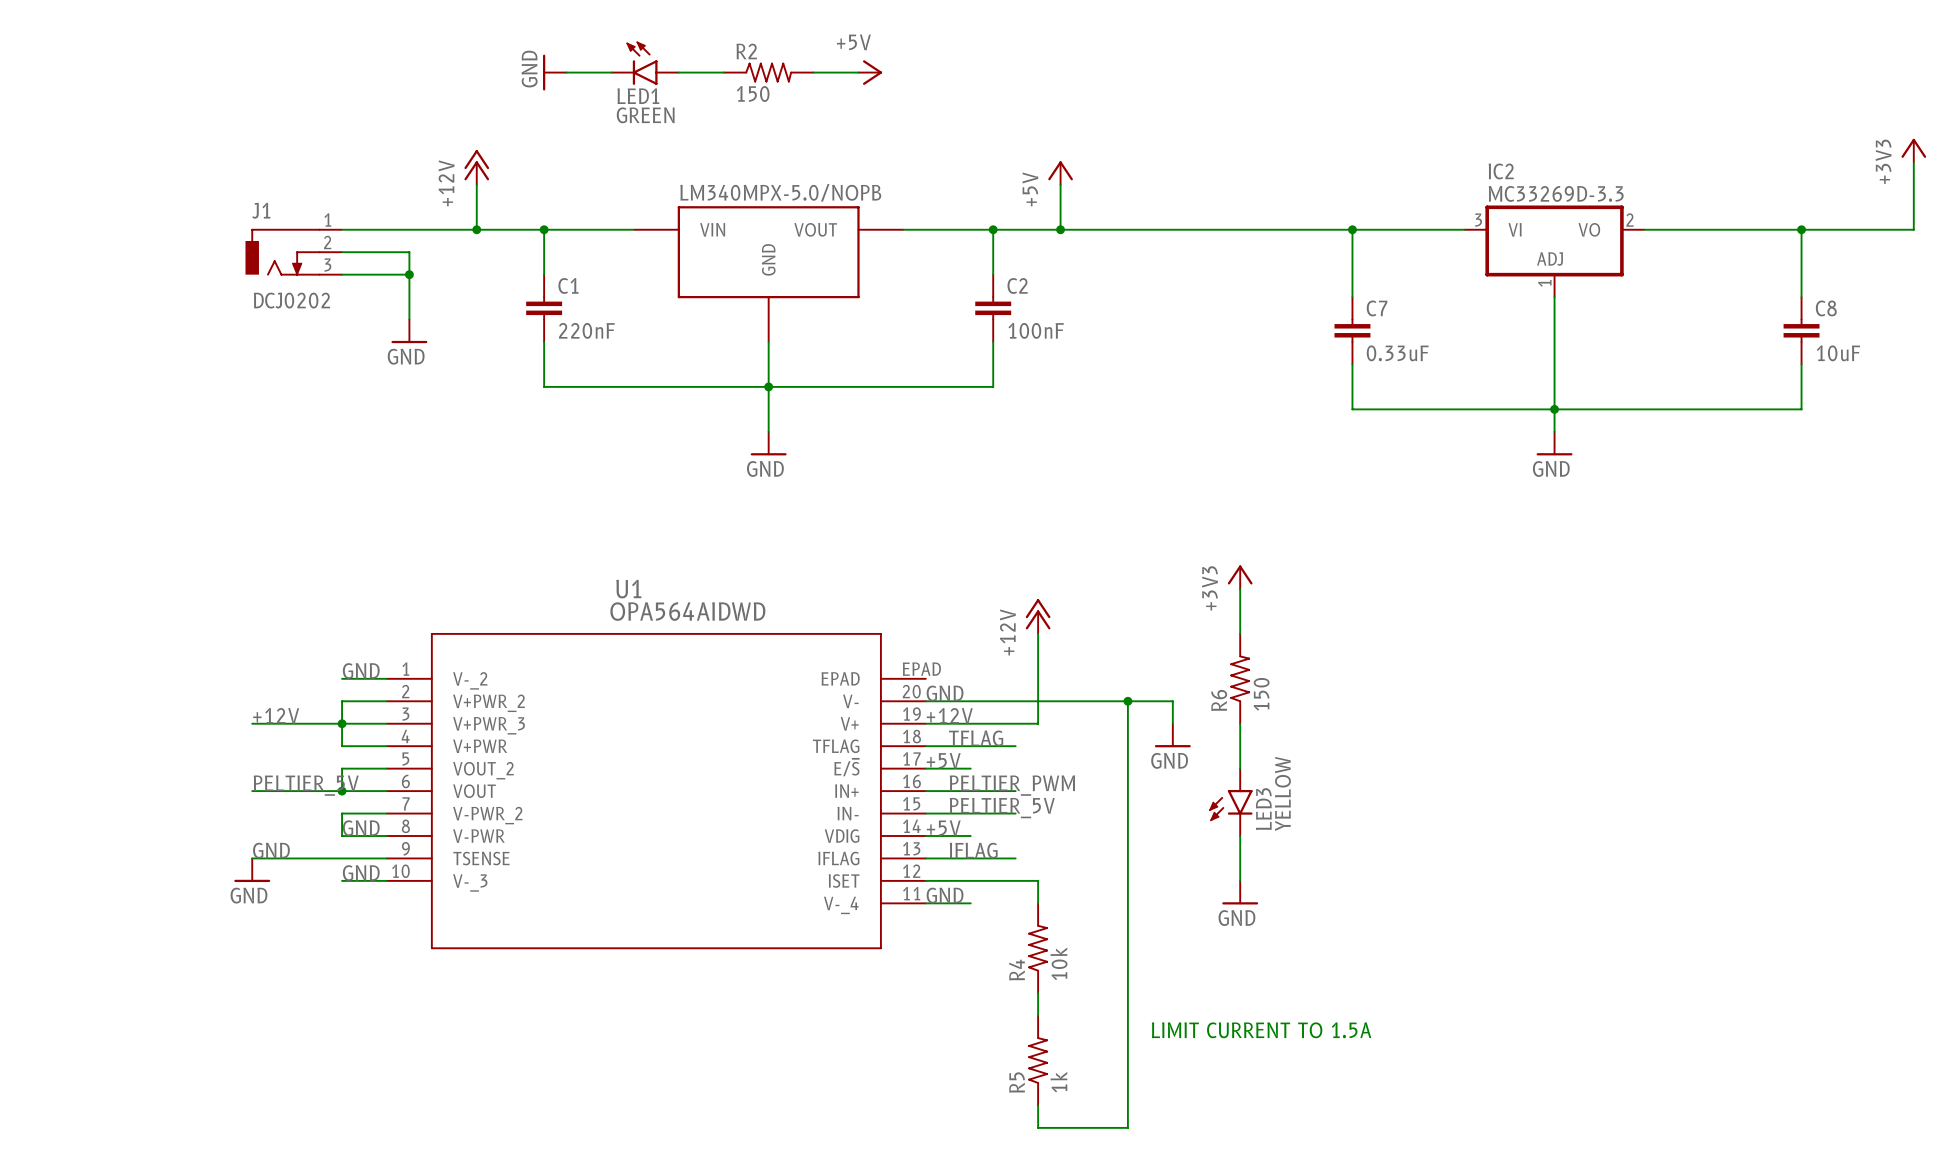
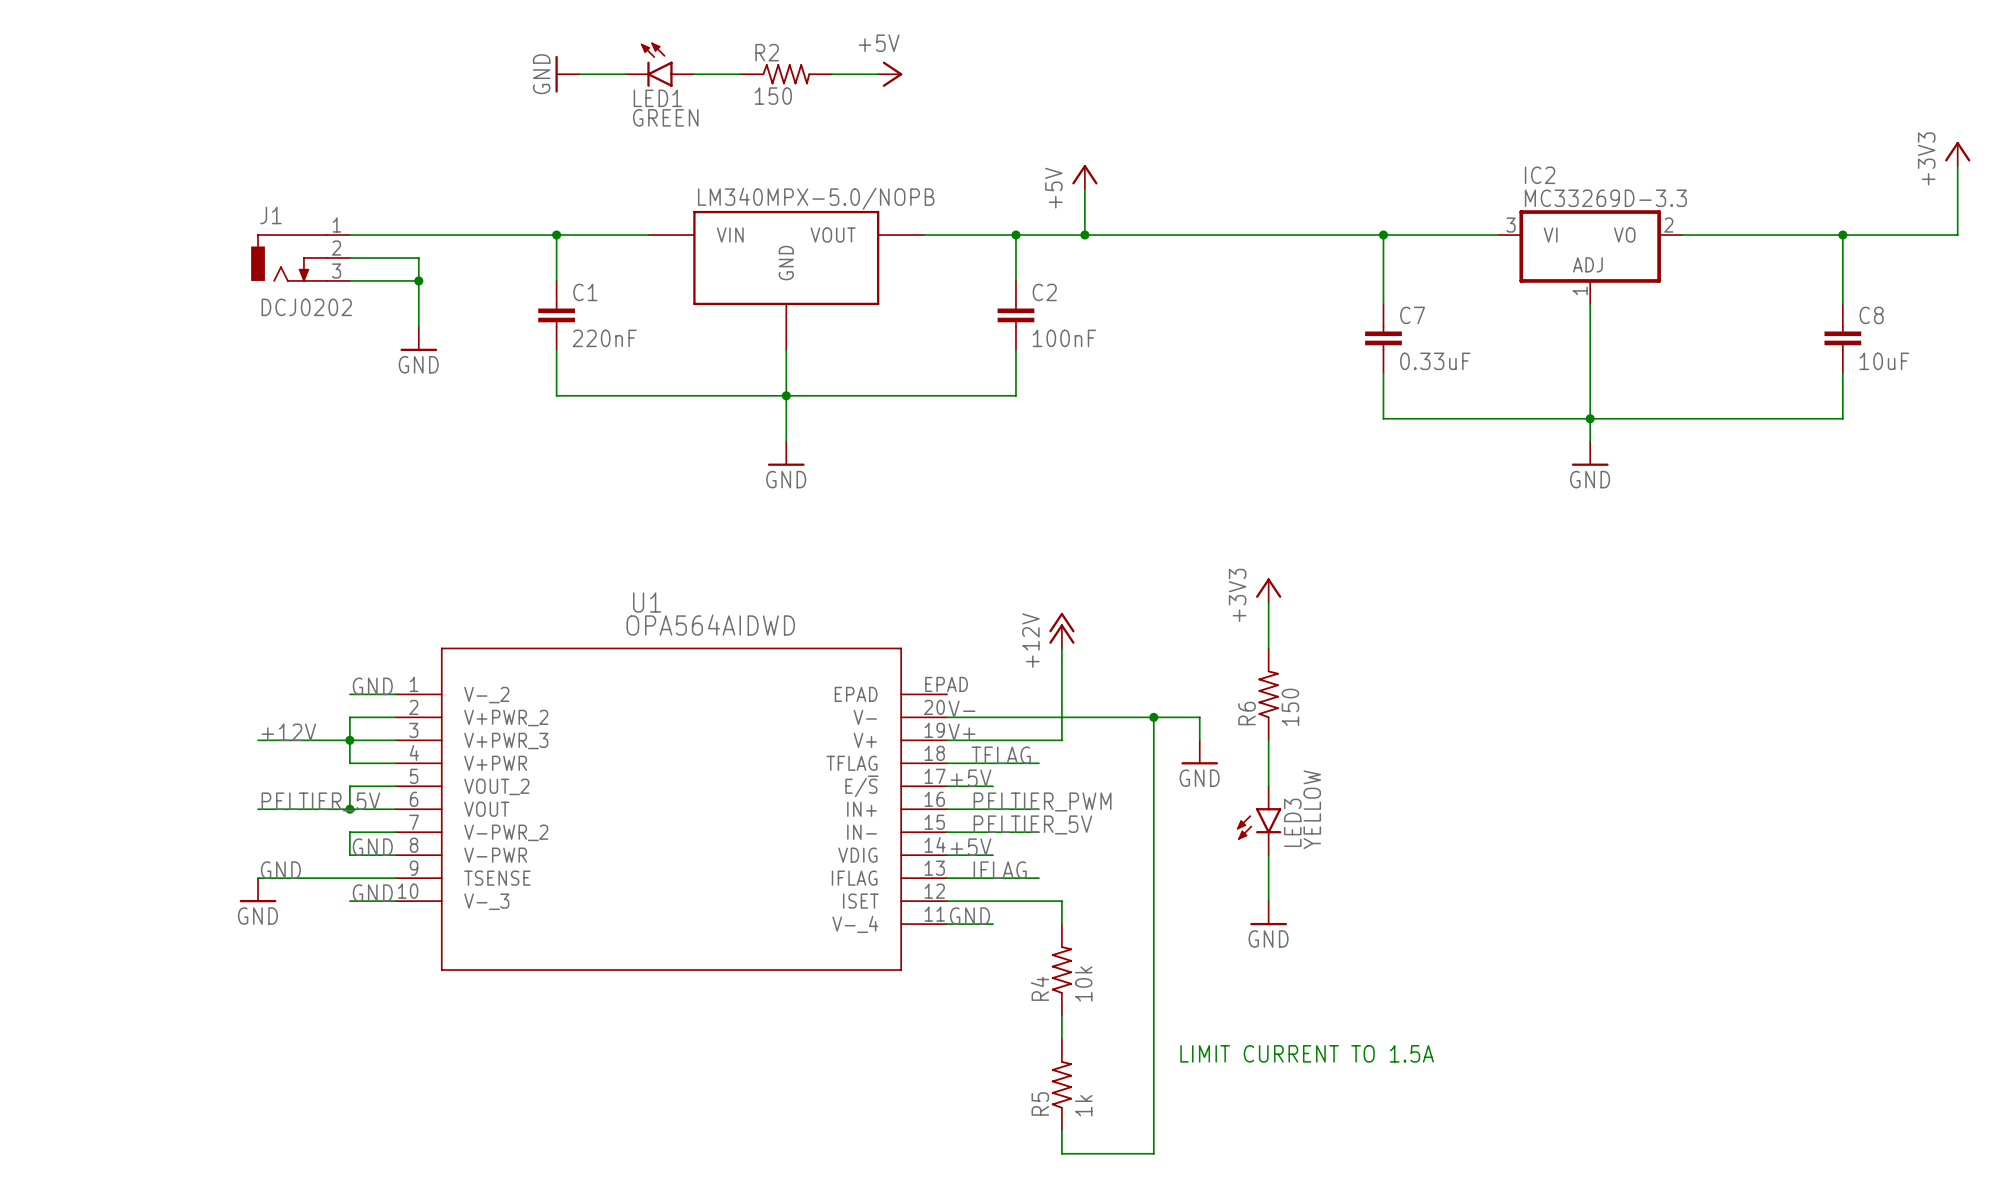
power symbol: +12V (476, 167) -> none
wire: (476, 184) (476, 229) -> none
junction: (476, 229) -> none
label: GND (945, 693) -> V- (962, 709)
label: +12V (949, 715) -> V+ (962, 732)

